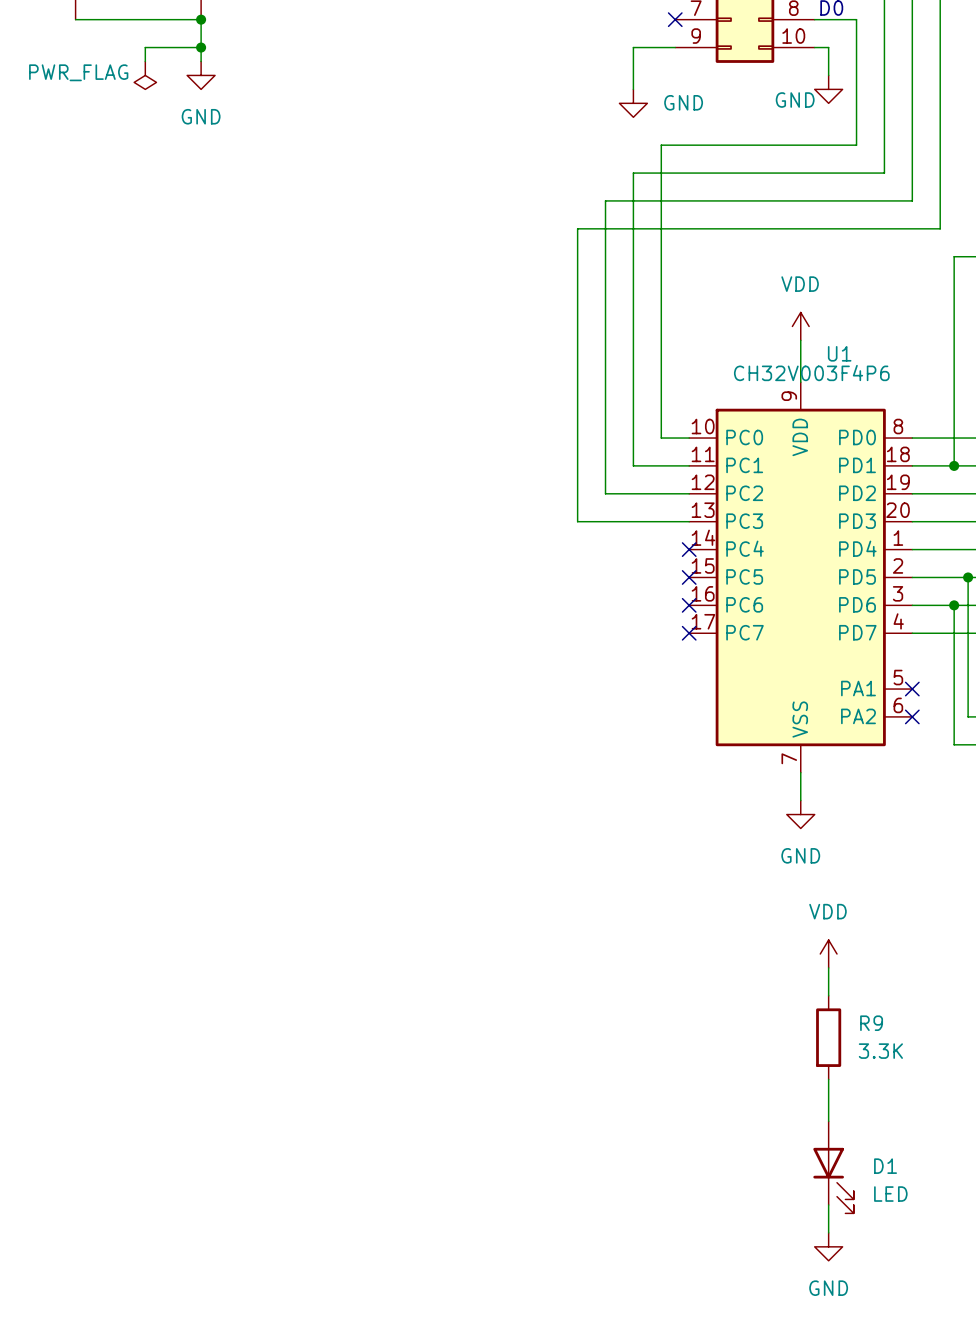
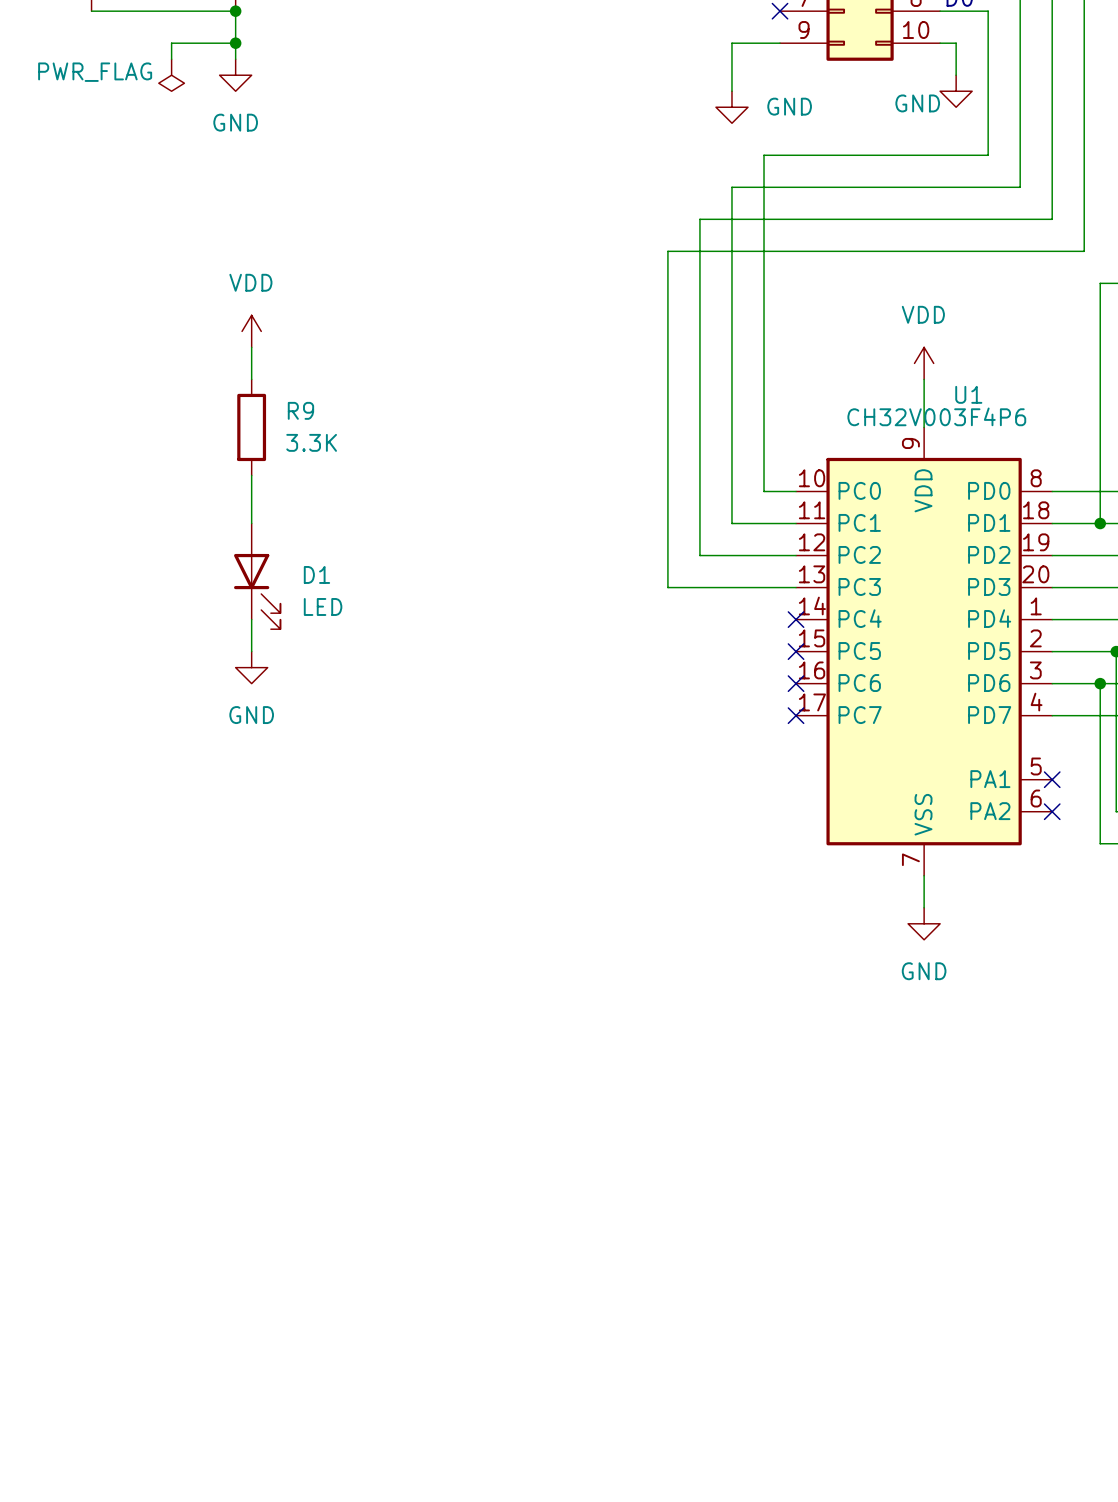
power symbol: none -> VDD (251, 331)
wire: none -> (251, 347) (251, 379)
wire: none -> (251, 475) (251, 523)
wire: none -> (251, 619) (251, 651)
power symbol: none -> GND (251, 667)
power symbol: VDD (828, 954) -> none
wire: (828, 967) (828, 995) -> none
R9 position: (828, 1037) -> (251, 427)
wire: (828, 1079) (828, 1121) -> none
D1 position: (833, 1167) -> (257, 576)
wire: (828, 1205) (828, 1232) -> none
power symbol: GND (828, 1246) -> none

